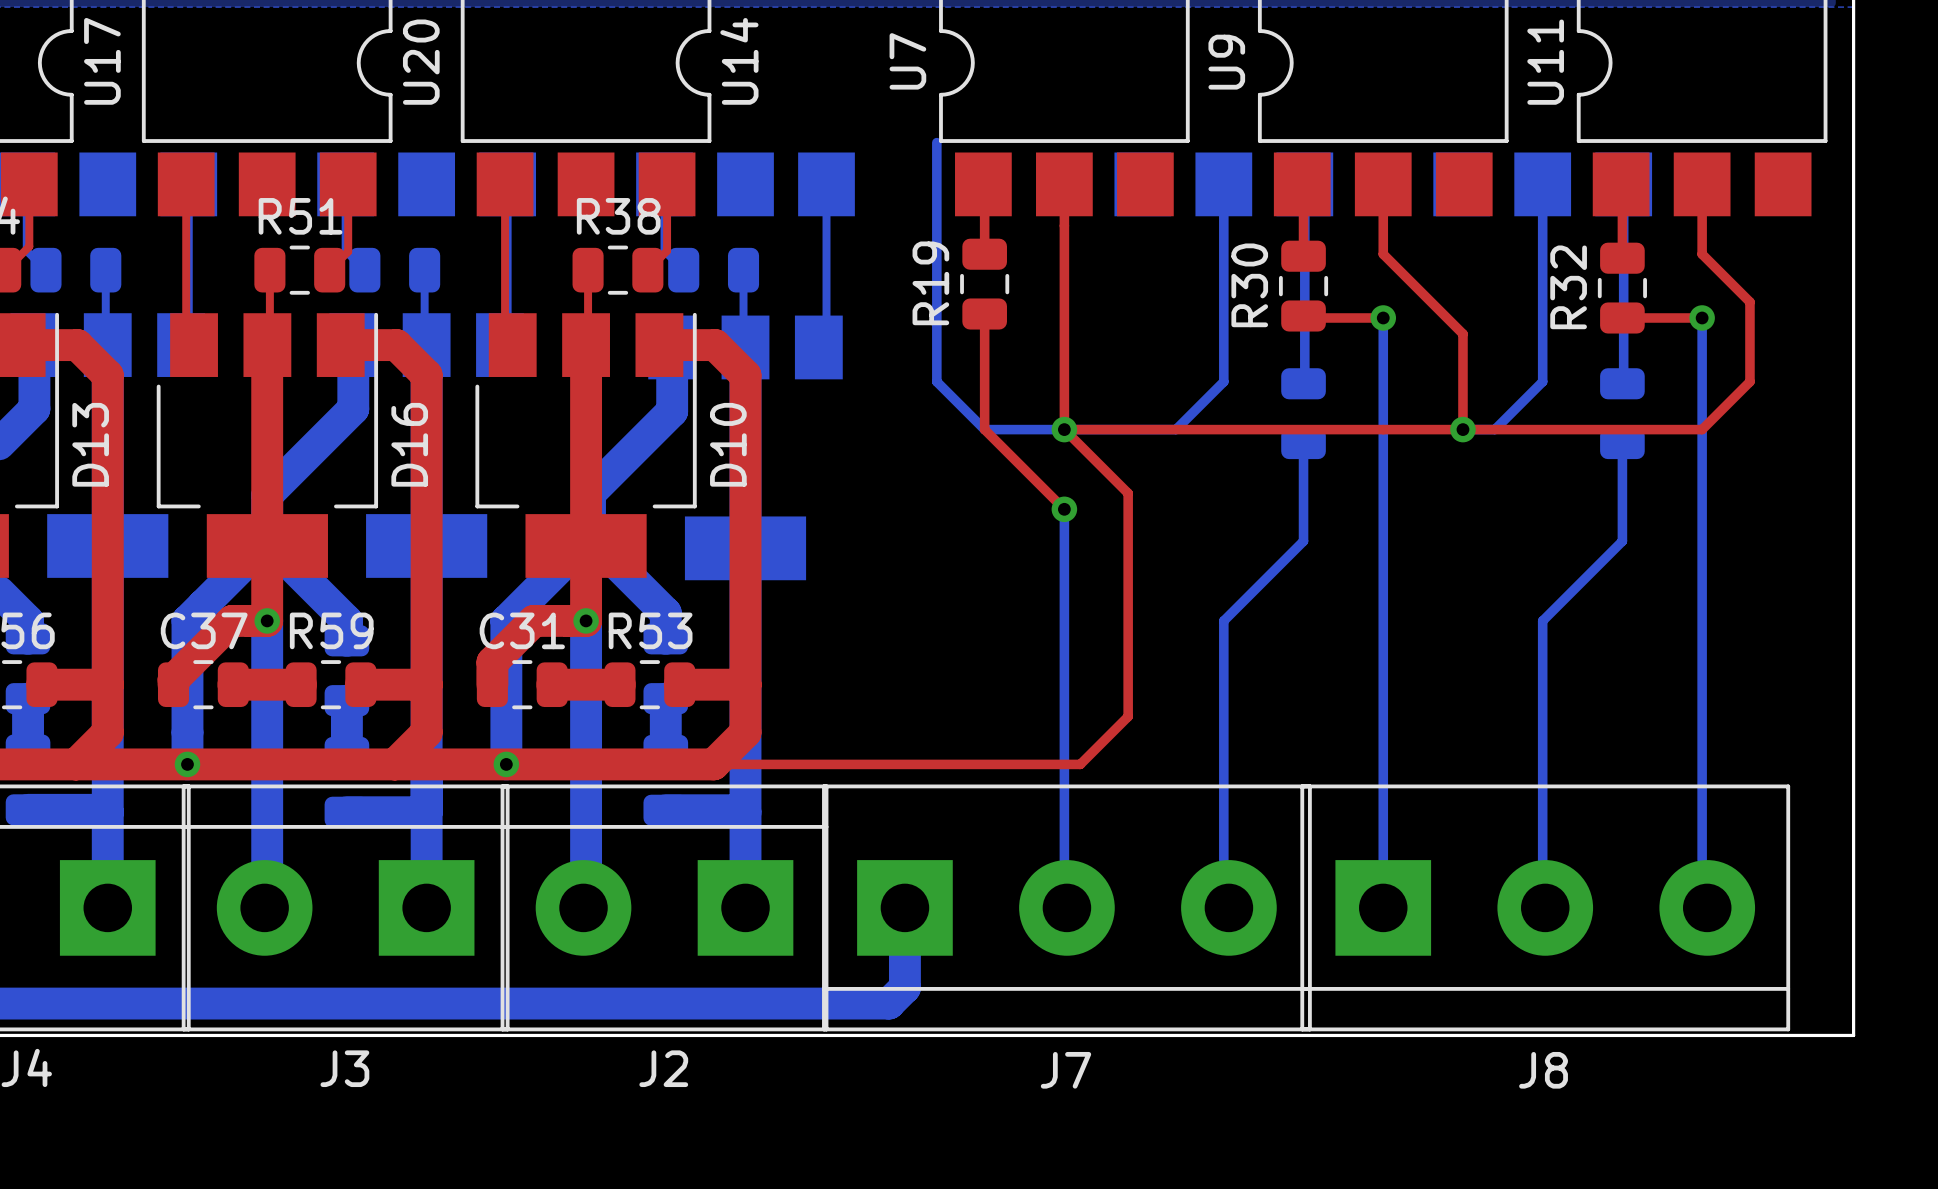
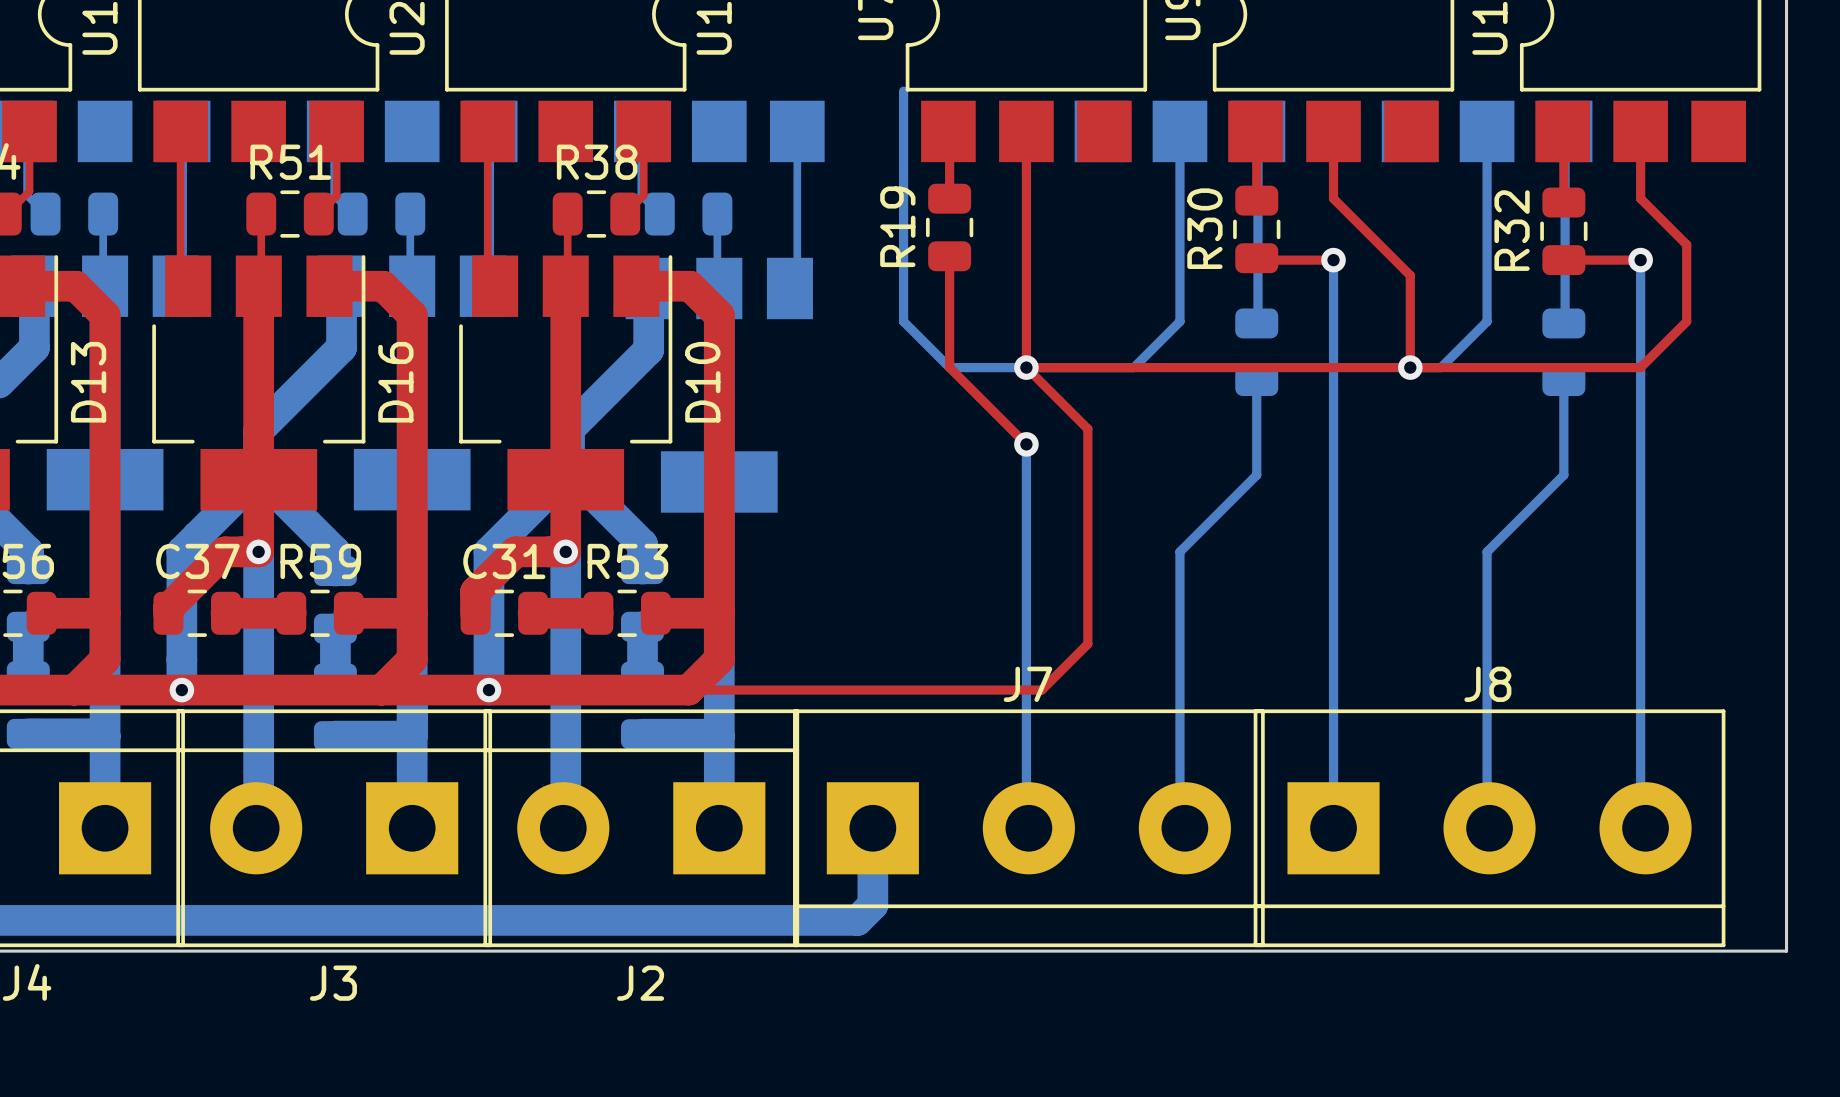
J7 name position: J7 (1065, 1070) -> J7 (1027, 684)
J8 name position: J8 (1543, 1070) -> J8 (1487, 684)

